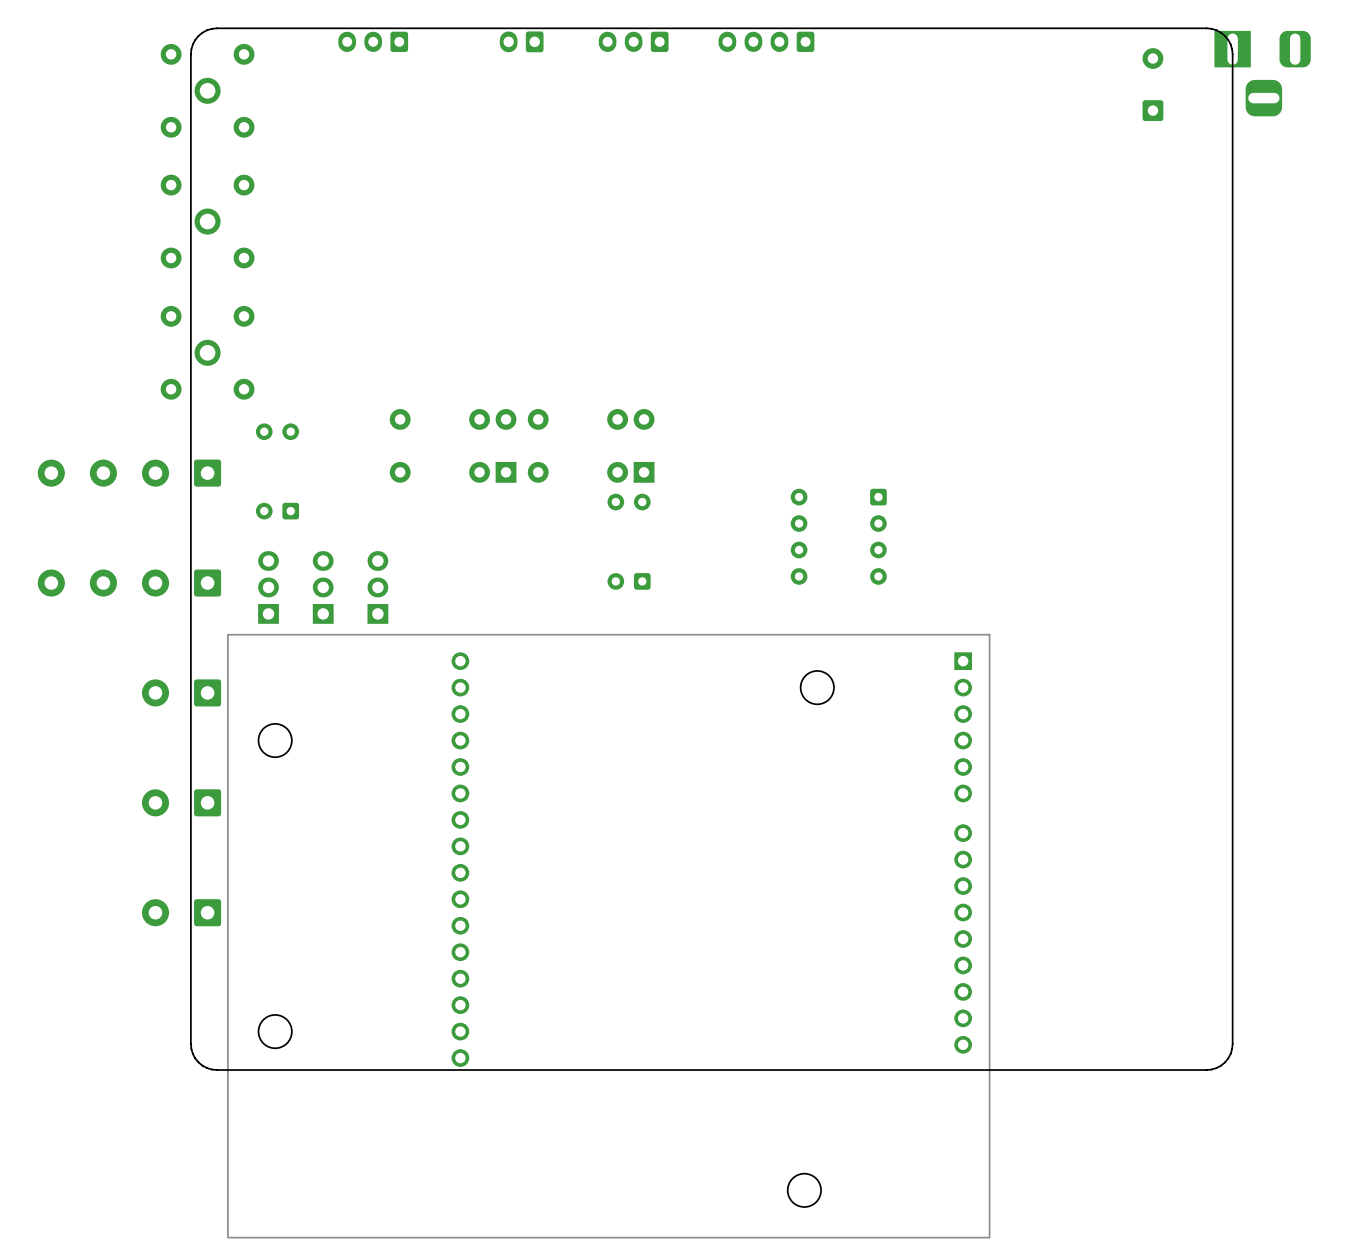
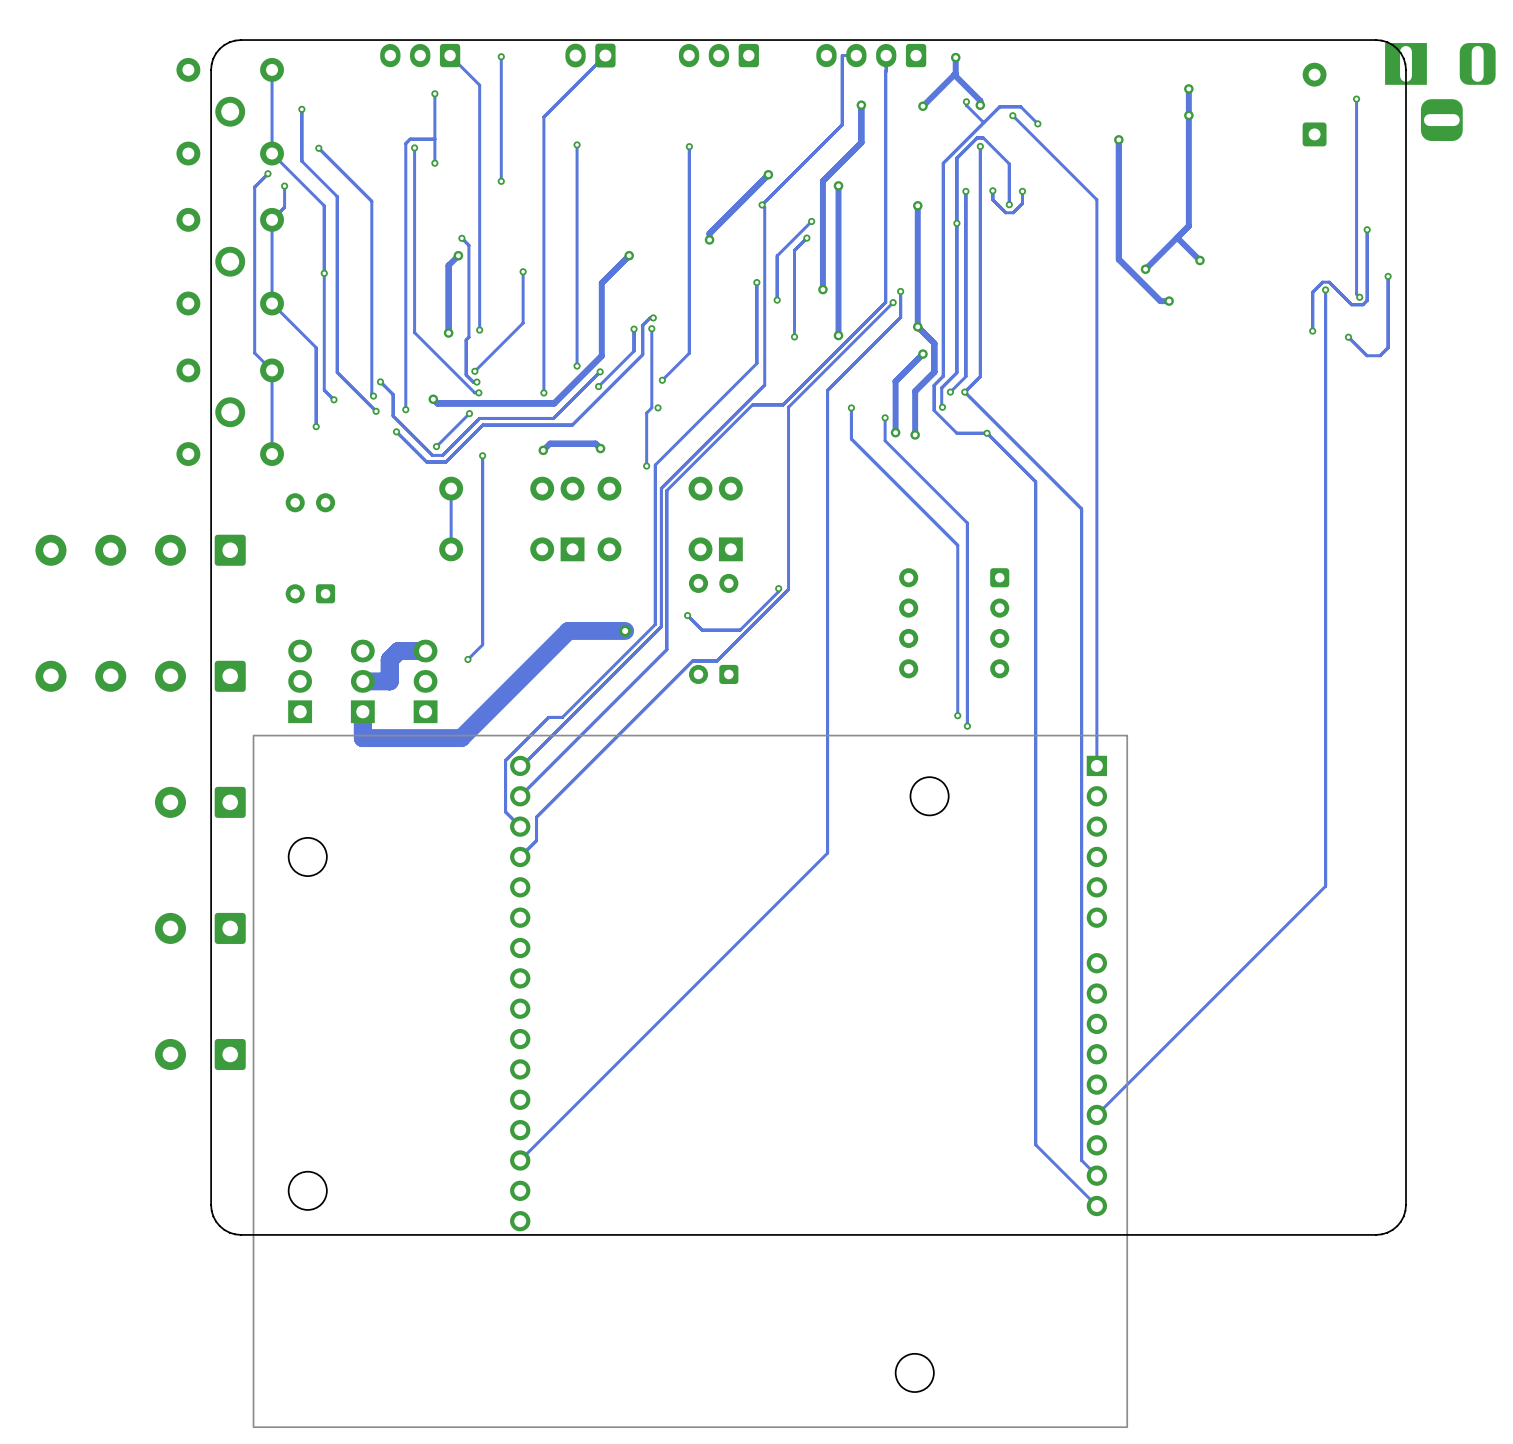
track: none -> (450, 55) (479, 85) (479, 330)
track: none -> (605, 55) (543, 117) (543, 392)
track: none -> (856, 55) (842, 55) (842, 124) (762, 204) (764, 207) (764, 385) (661, 488) (661, 626) (520, 765)
track: none -> (886, 55) (885, 302) (783, 404) (752, 404) (666, 490) (666, 649) (520, 796)
track: none -> (501, 56) (501, 181)
via: none -> (501, 56)
track: none -> (955, 57) (954, 74)
via: none -> (955, 57)
track: none -> (272, 69) (272, 153) (324, 205) (324, 390) (333, 399)
track: none -> (954, 74) (980, 100) (980, 105)
track: none -> (954, 74) (922, 106)
track: none -> (1188, 88) (1188, 225) (1145, 269)
via: none -> (1188, 88)
track: none -> (434, 93) (434, 163)
via: none -> (434, 93)
track: none -> (1356, 99) (1356, 294) (1359, 297)
via: none -> (1356, 99)
track: none -> (966, 101) (966, 105) (983, 122)
via: none -> (966, 101)
track: none -> (861, 105) (861, 142) (822, 181) (822, 289)
via: none -> (861, 105)
via: none -> (980, 105)
via: none -> (922, 106)
track: none -> (301, 109) (301, 161) (337, 196) (337, 372) (376, 411)
via: none -> (301, 109)
track: none -> (1012, 115) (1096, 199) (1096, 765)
via: none -> (1012, 115)
via: none -> (1188, 115)
track: none -> (1037, 123) (1020, 106) (999, 106) (943, 163) (943, 376) (934, 385) (934, 410) (956, 433) (987, 433) (1035, 481) (1035, 1144) (1096, 1206)
via: none -> (1037, 123)
track: none -> (434, 139) (410, 139) (405, 143) (405, 409)
track: none -> (1118, 139) (1118, 259) (1160, 301) (1169, 301)
via: none -> (1118, 139)
track: none -> (577, 144) (577, 366)
via: none -> (577, 144)
track: none -> (689, 146) (689, 353) (662, 380)
via: none -> (689, 146)
track: none -> (980, 146) (980, 376) (964, 392) (1081, 508) (1081, 1160) (1096, 1175)
via: none -> (980, 146)
track: none -> (318, 148) (371, 201) (371, 394) (373, 396)
via: none -> (318, 148)
track: none -> (414, 147) (414, 332) (474, 392) (478, 392)
via: none -> (414, 147)
via: none -> (434, 163)
track: none -> (267, 173) (254, 187) (254, 353) (272, 370) (272, 454)
via: none -> (267, 173)
track: none -> (768, 174) (709, 233) (709, 239)
via: none -> (768, 174)
via: none -> (501, 181)
track: none -> (284, 186) (284, 207) (272, 219) (272, 303) (316, 347) (316, 426)
via: none -> (284, 186)
track: none -> (838, 185) (838, 335)
via: none -> (838, 185)
track: none -> (992, 190) (992, 199) (1005, 212) (1013, 212) (1022, 203) (1022, 191)
via: none -> (992, 190)
track: none -> (965, 191) (965, 376) (950, 392)
via: none -> (965, 191)
via: none -> (1022, 191)
track: none -> (1009, 204) (1009, 163) (983, 137) (977, 137) (956, 158) (956, 372) (941, 387) (942, 407)
via: none -> (1009, 204)
via: none -> (762, 204)
track: none -> (917, 205) (917, 326) (934, 343) (934, 372) (915, 391) (915, 434)
via: none -> (917, 205)
track: none -> (811, 221) (777, 255) (777, 300)
via: none -> (811, 221)
via: none -> (956, 223)
track: none -> (1367, 229) (1367, 300) (1362, 304) (1351, 304) (1329, 282) (1322, 282) (1312, 292) (1312, 331)
via: none -> (1367, 229)
track: none -> (806, 238) (794, 250) (794, 336)
via: none -> (806, 238)
track: none -> (1177, 237) (1199, 260)
track: none -> (461, 238) (468, 245) (468, 337) (466, 340) (466, 374) (473, 382) (476, 382)
via: none -> (461, 238)
via: none -> (709, 239)
track: none -> (458, 255) (448, 265) (448, 333)
via: none -> (458, 255)
track: none -> (629, 255) (601, 283) (601, 355) (554, 403) (437, 403) (433, 399)
via: none -> (629, 255)
via: none -> (1199, 260)
via: none -> (1145, 269)
track: none -> (523, 271) (523, 323) (474, 371)
via: none -> (523, 271)
via: none -> (324, 273)
track: none -> (1388, 276) (1388, 347) (1380, 355) (1367, 355) (1348, 337)
via: none -> (1388, 276)
track: none -> (756, 282) (756, 363) (655, 465) (655, 624) (562, 717) (548, 717) (505, 760) (505, 811) (520, 826)
via: none -> (756, 282)
via: none -> (822, 289)
track: none -> (1325, 289) (1325, 886) (1096, 1114)
via: none -> (1325, 289)
track: none -> (900, 291) (900, 317) (827, 390) (827, 853) (520, 1160)
via: none -> (900, 291)
via: none -> (1359, 297)
via: none -> (777, 300)
via: none -> (1169, 301)
track: none -> (893, 302) (788, 407) (788, 589) (716, 660) (692, 660) (536, 817) (536, 840) (520, 856)
via: none -> (893, 302)
track: none -> (653, 317) (650, 317) (642, 325) (642, 354) (572, 425) (482, 425) (445, 462) (426, 462) (396, 431)
via: none -> (653, 317)
via: none -> (917, 326)
track: none -> (634, 329) (634, 351) (598, 386)
via: none -> (634, 329)
track: none -> (651, 328) (651, 407) (646, 413) (646, 466)
via: none -> (651, 328)
via: none -> (479, 330)
via: none -> (1312, 331)
via: none -> (448, 333)
via: none -> (838, 335)
via: none -> (794, 336)
via: none -> (1348, 337)
track: none -> (922, 354) (895, 381) (895, 432)
via: none -> (922, 354)
via: none -> (577, 366)
via: none -> (474, 371)
track: none -> (600, 371) (553, 418) (479, 418) (442, 455) (432, 455) (393, 415) (393, 394) (380, 381)
via: none -> (600, 371)
via: none -> (662, 380)
via: none -> (380, 381)
via: none -> (476, 382)
via: none -> (598, 386)
via: none -> (478, 392)
via: none -> (950, 392)
via: none -> (964, 392)
via: none -> (543, 392)
via: none -> (373, 396)
via: none -> (333, 399)
via: none -> (433, 399)
via: none -> (942, 407)
via: none -> (658, 407)
track: none -> (851, 407) (851, 439) (957, 545) (957, 715)
via: none -> (851, 407)
via: none -> (405, 409)
via: none -> (376, 411)
track: none -> (469, 413) (436, 446)
via: none -> (469, 413)
track: none -> (885, 417) (885, 440) (967, 523) (967, 726)
via: none -> (885, 417)
via: none -> (316, 426)
via: none -> (396, 431)
via: none -> (895, 432)
via: none -> (987, 433)
via: none -> (915, 434)
via: none -> (436, 446)
track: none -> (600, 448) (595, 443) (549, 443) (543, 450)
via: none -> (600, 448)
via: none -> (543, 450)
track: none -> (482, 455) (482, 644) (467, 659)
via: none -> (482, 455)
via: none -> (646, 466)
track: none -> (451, 488) (451, 549)
track: none -> (778, 588) (778, 591) (740, 630) (702, 630) (687, 615)
via: none -> (778, 588)
via: none -> (687, 615)
track: none -> (625, 630) (568, 630) (461, 738) (362, 738) (362, 711)
via: none -> (625, 630)
track: none -> (425, 651) (398, 651) (389, 659) (389, 681) (362, 681)
via: none -> (467, 659)
via: none -> (957, 715)
via: none -> (967, 726)

